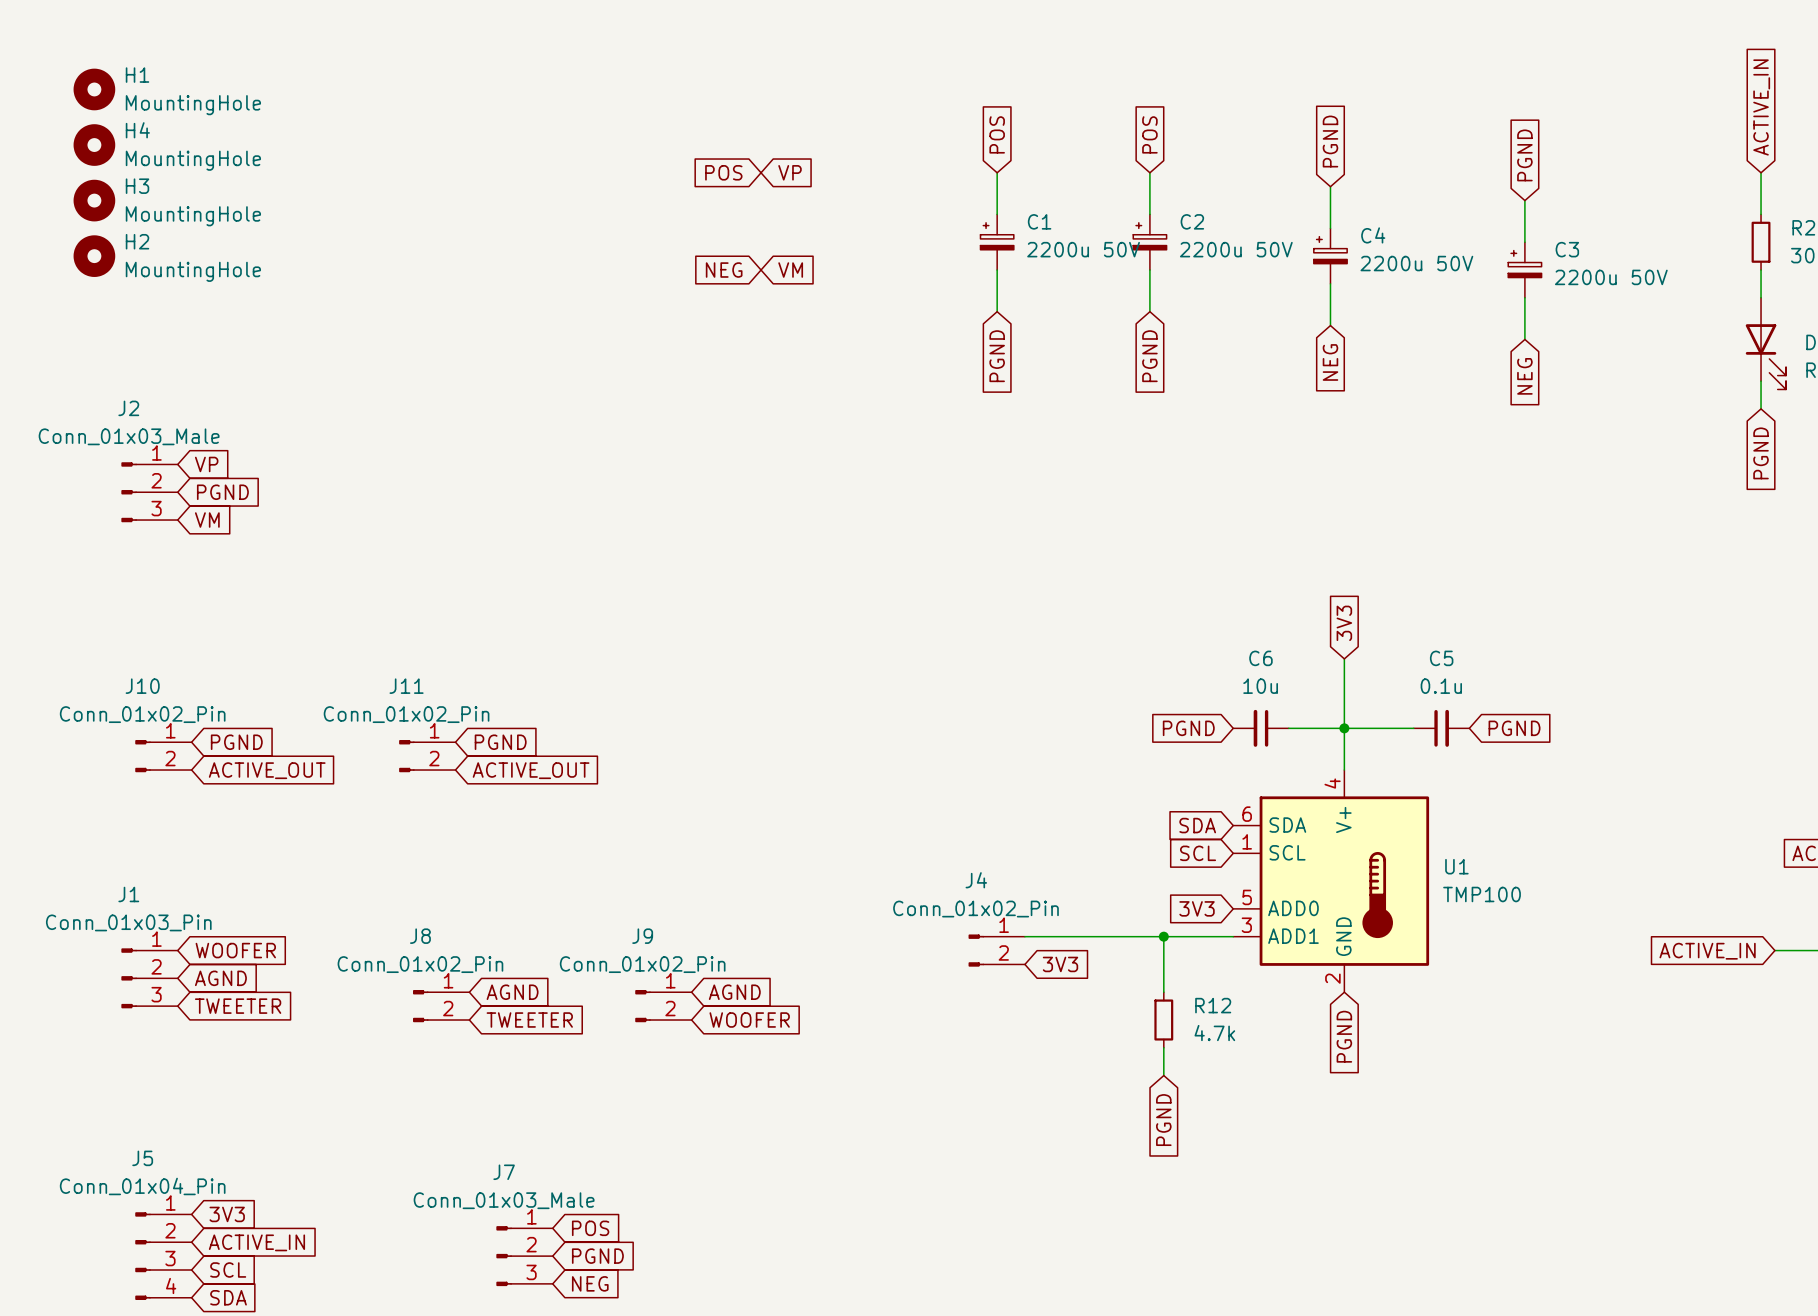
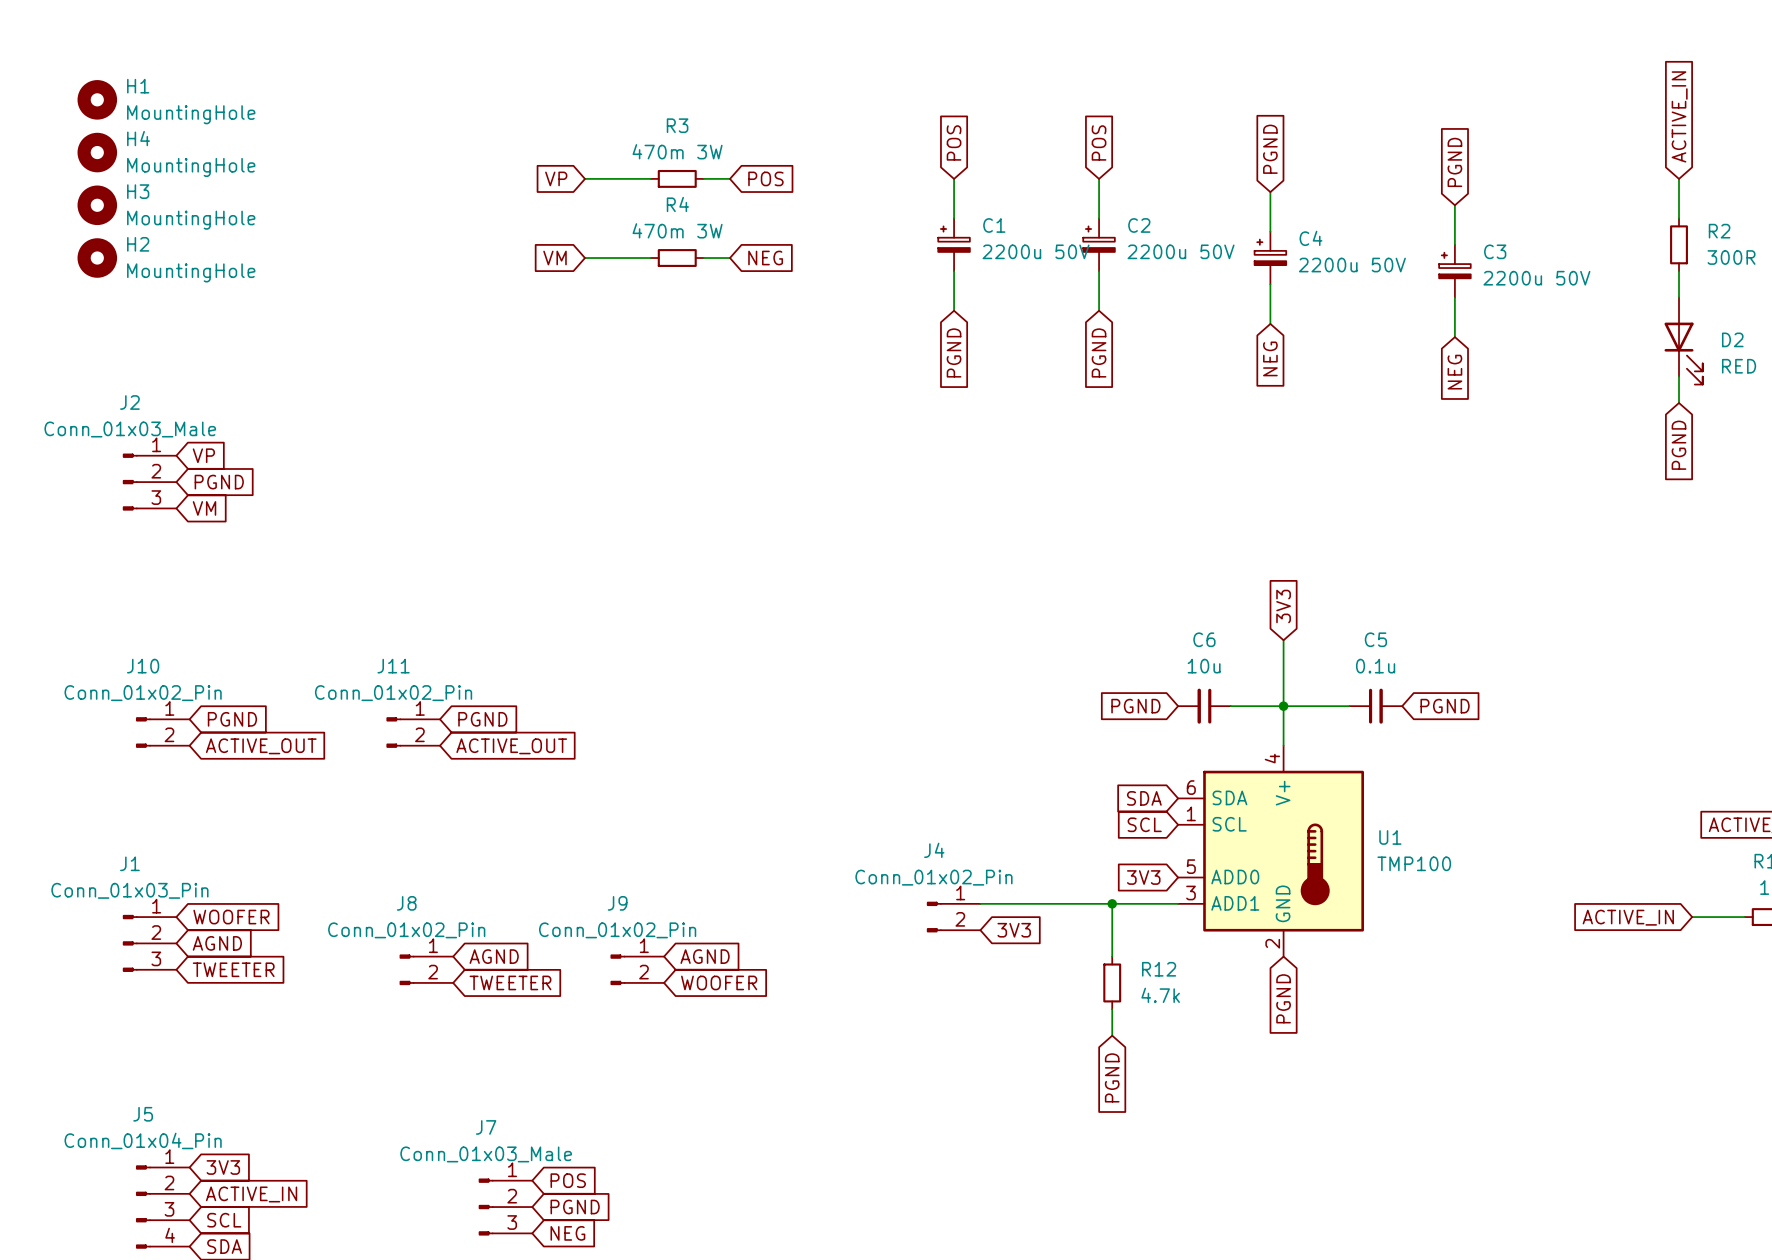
wire: none -> (584, 178) (650, 178)
R3: none -> 470m 3W (677, 178)
global label rotation: 0° (723, 172) -> 180° (765, 178)
wire: none -> (703, 178) (729, 178)
global label rotation: 0° (790, 172) -> 180° (556, 178)
global label position: VP (790, 172) -> VP (556, 178)
wire: none -> (584, 258) (650, 258)
R4: none -> 470m 3W (677, 258)
global label rotation: 0° (724, 270) -> 180° (765, 258)
global label position: NEG (724, 270) -> NEG (765, 258)
global label rotation: 0° (790, 270) -> 180° (555, 258)
global label position: VM (790, 270) -> VM (555, 258)

